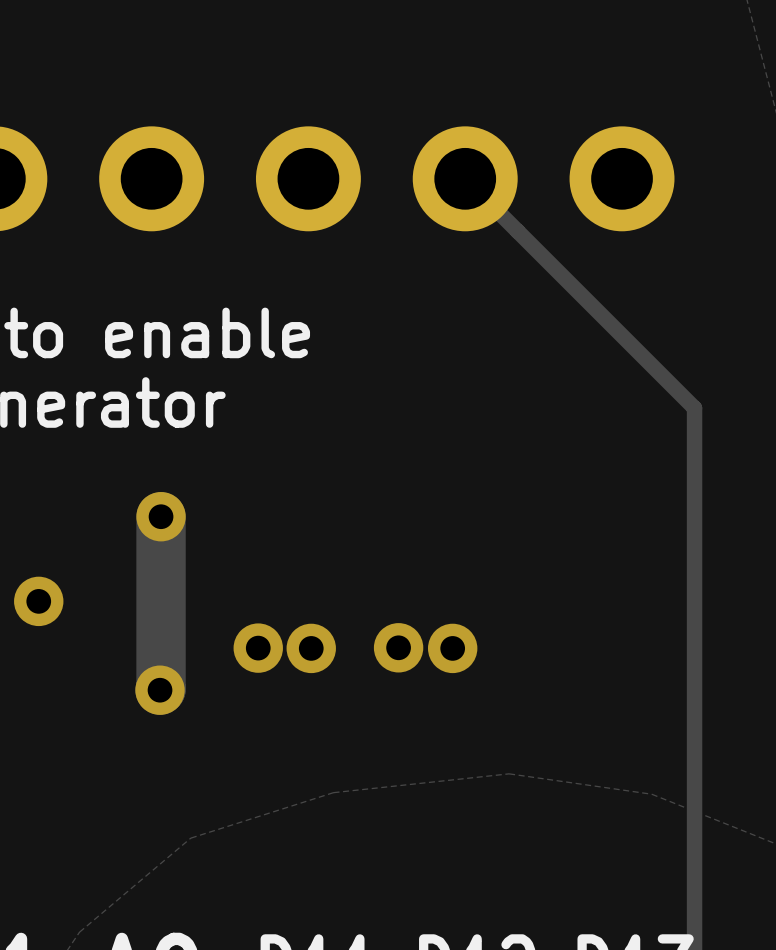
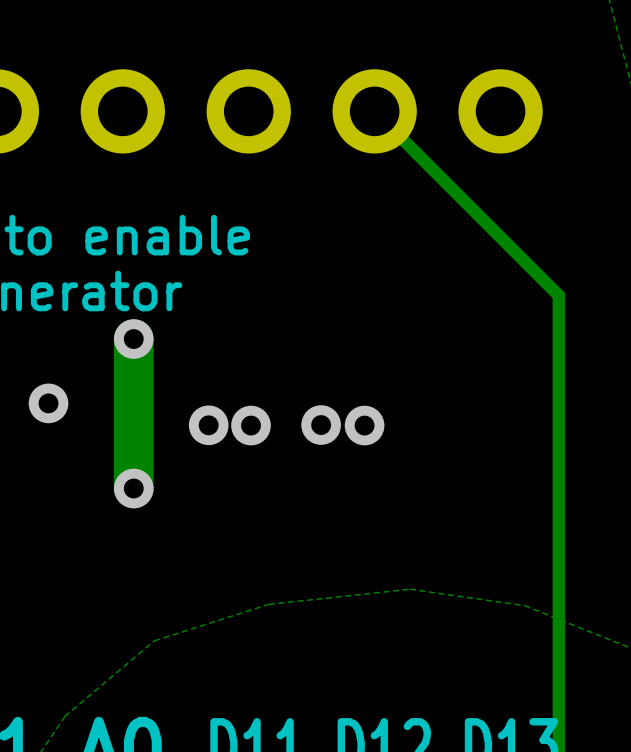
track: none -> (133, 339) (133, 488)
via: none -> (133, 339)
track: (161, 516) (160, 690) -> none
via: (161, 516) -> none
via: none -> (48, 403)
via: none -> (208, 425)
via: none -> (321, 425)
via: none -> (251, 425)
via: none -> (364, 425)
via: (38, 601) -> none
via: (398, 647) -> none
via: (258, 648) -> none
via: (311, 648) -> none
via: (452, 648) -> none
via position: (160, 690) -> (133, 488)

